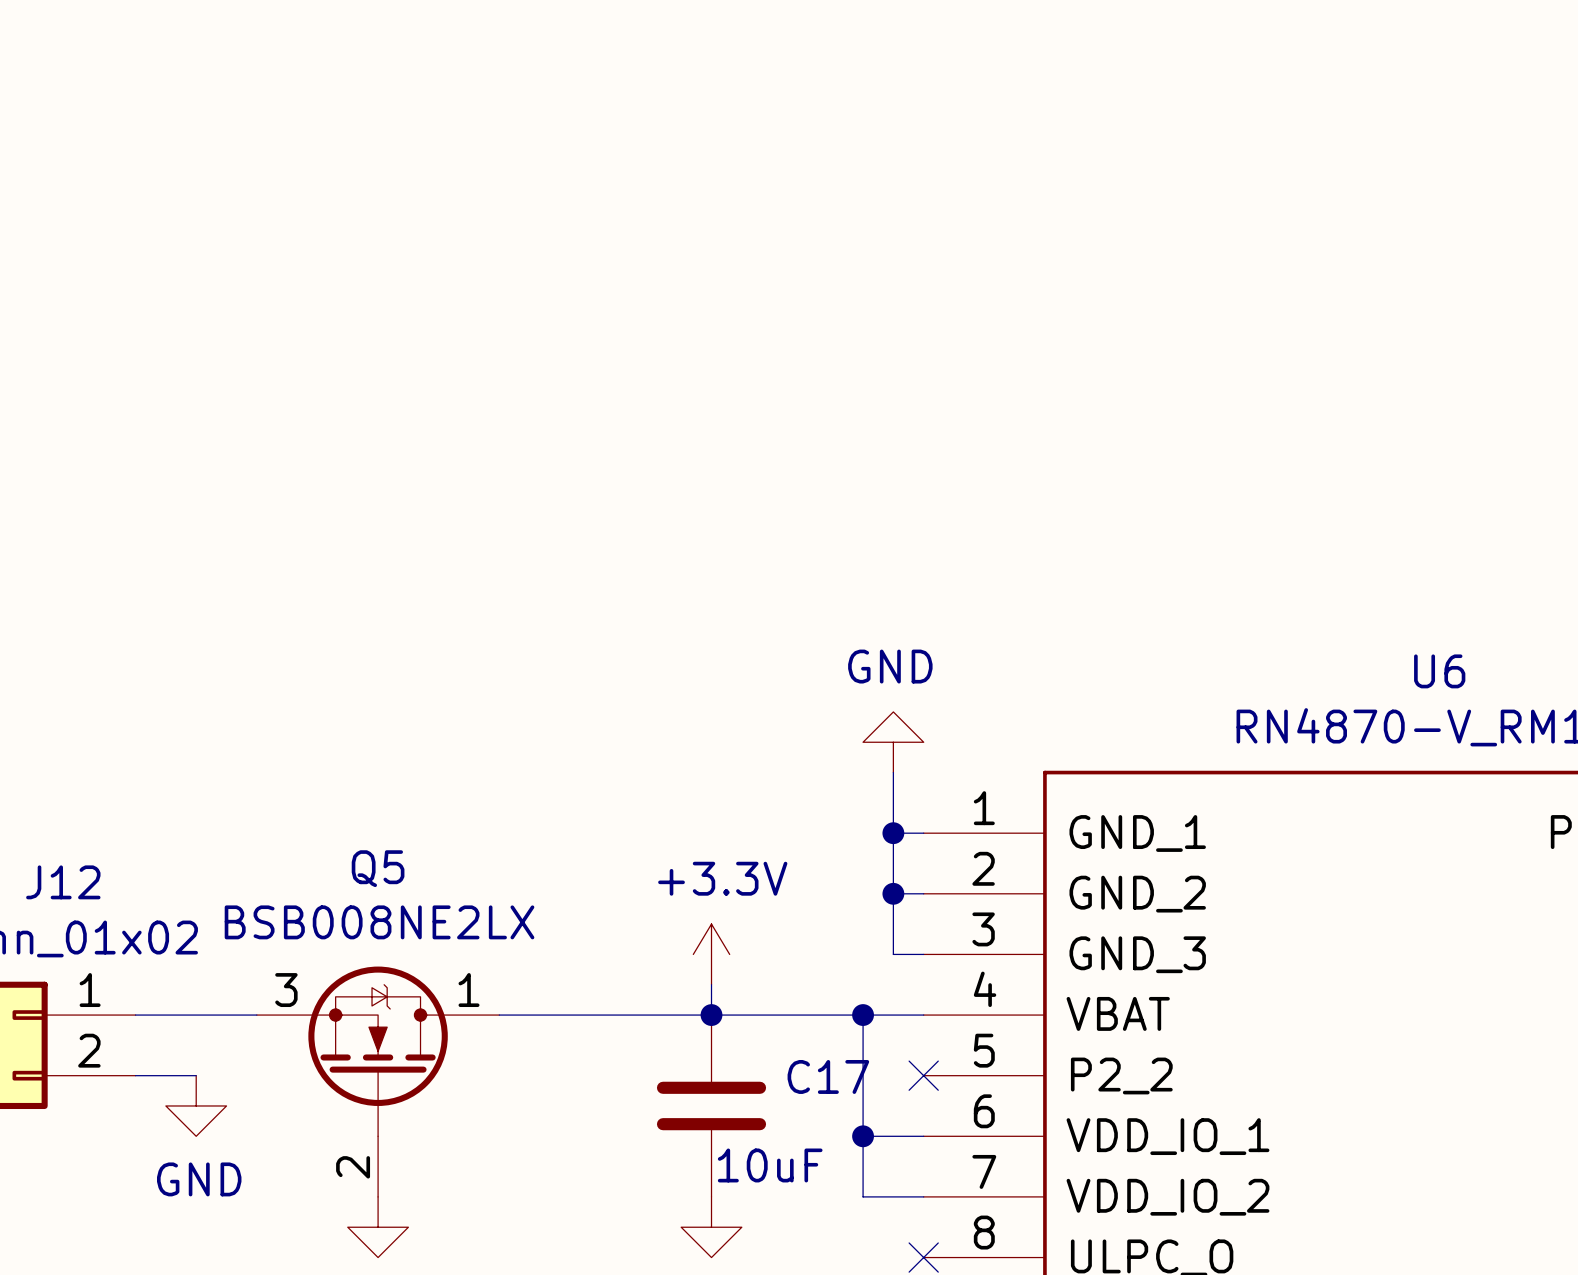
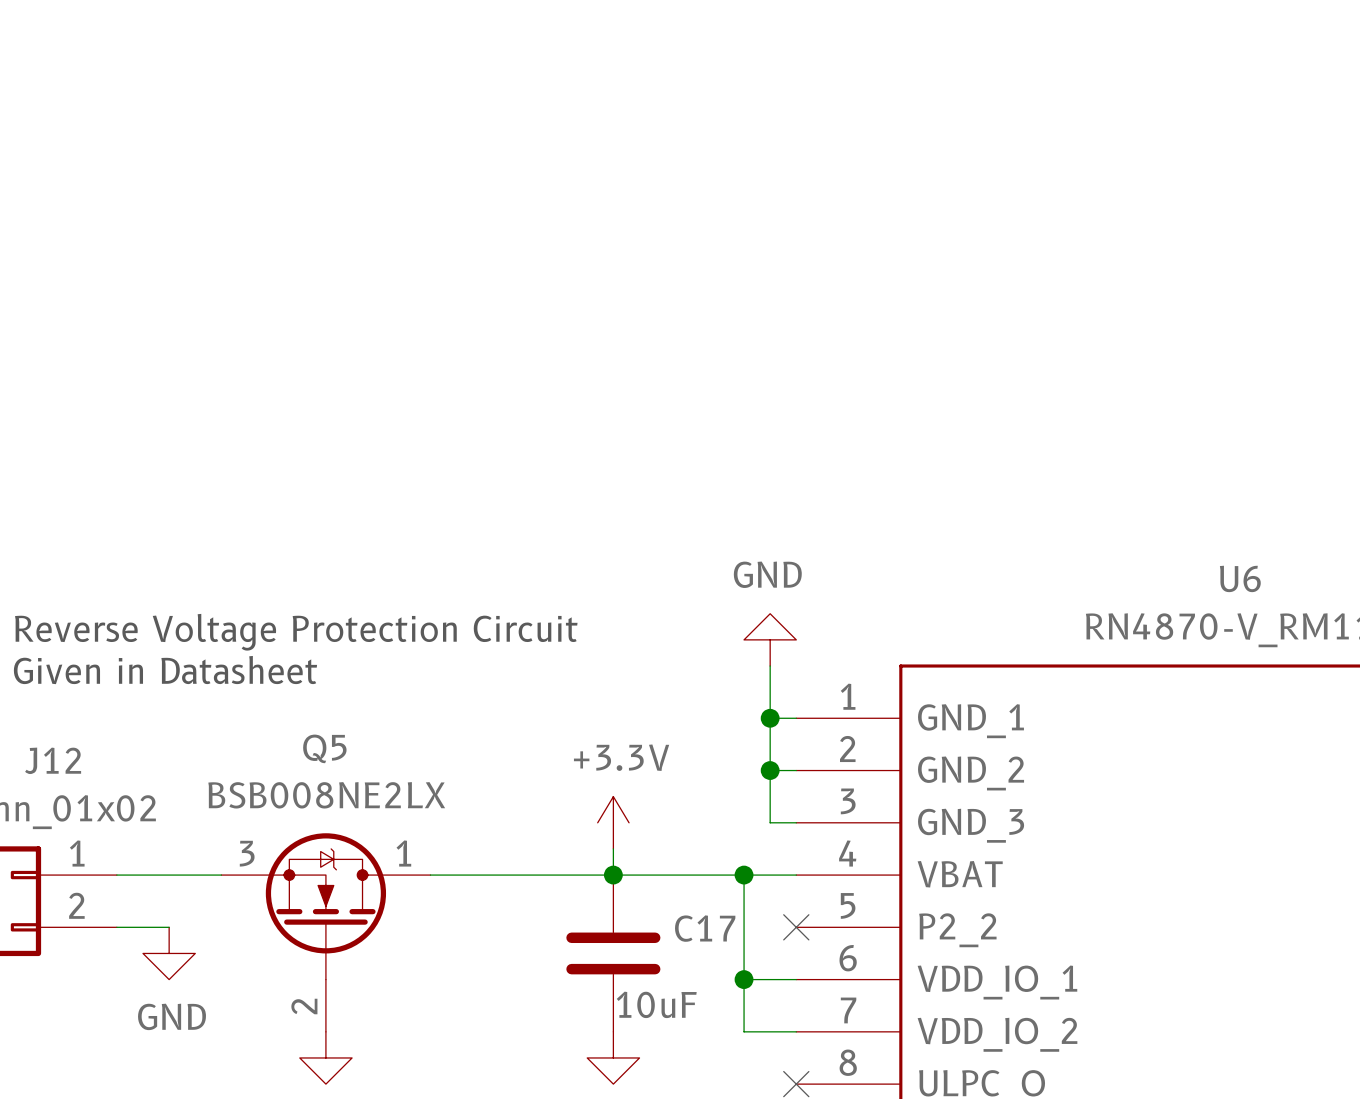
text: none -> Reverse Voltage Protection Circuit (296, 632)
text: none -> Given in Datasheet (165, 670)

